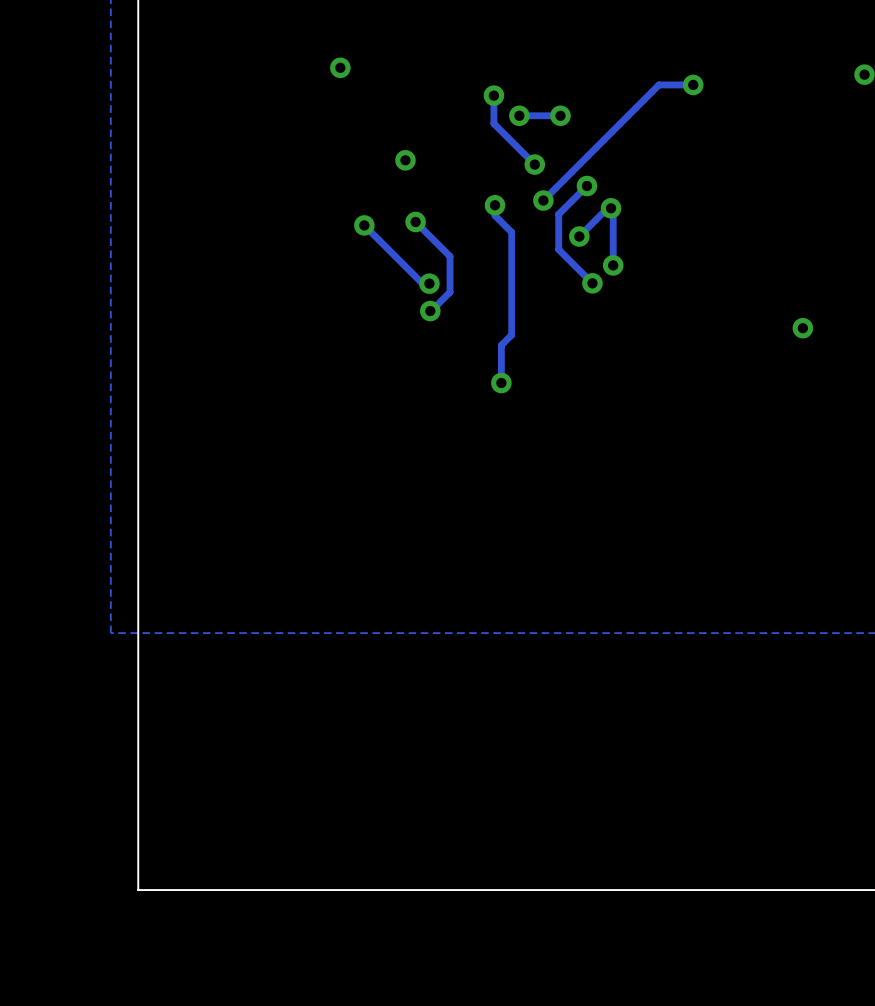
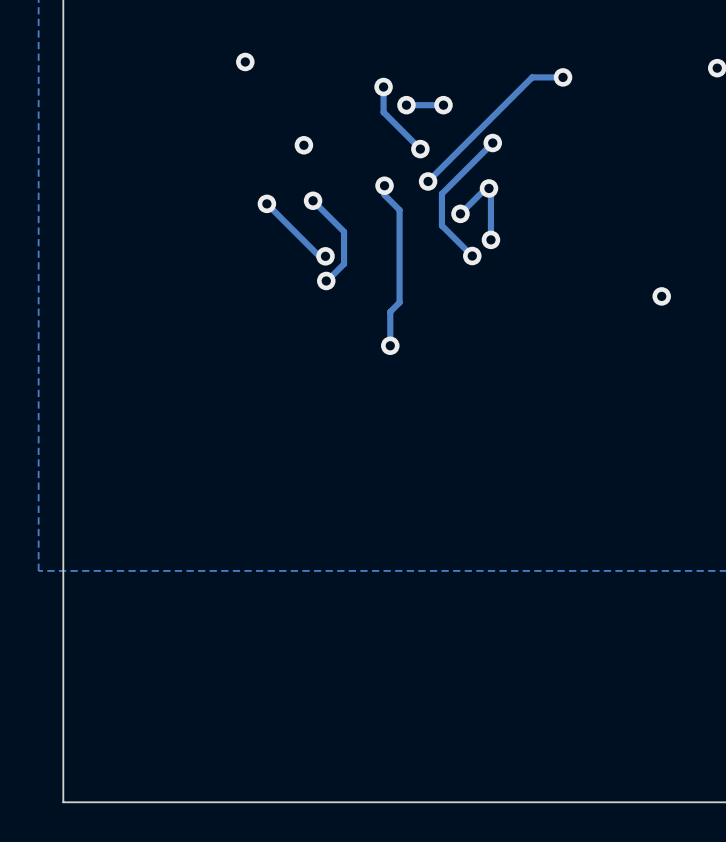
track: none -> (492, 143) (467, 168)
via position: (586, 186) -> (492, 143)

